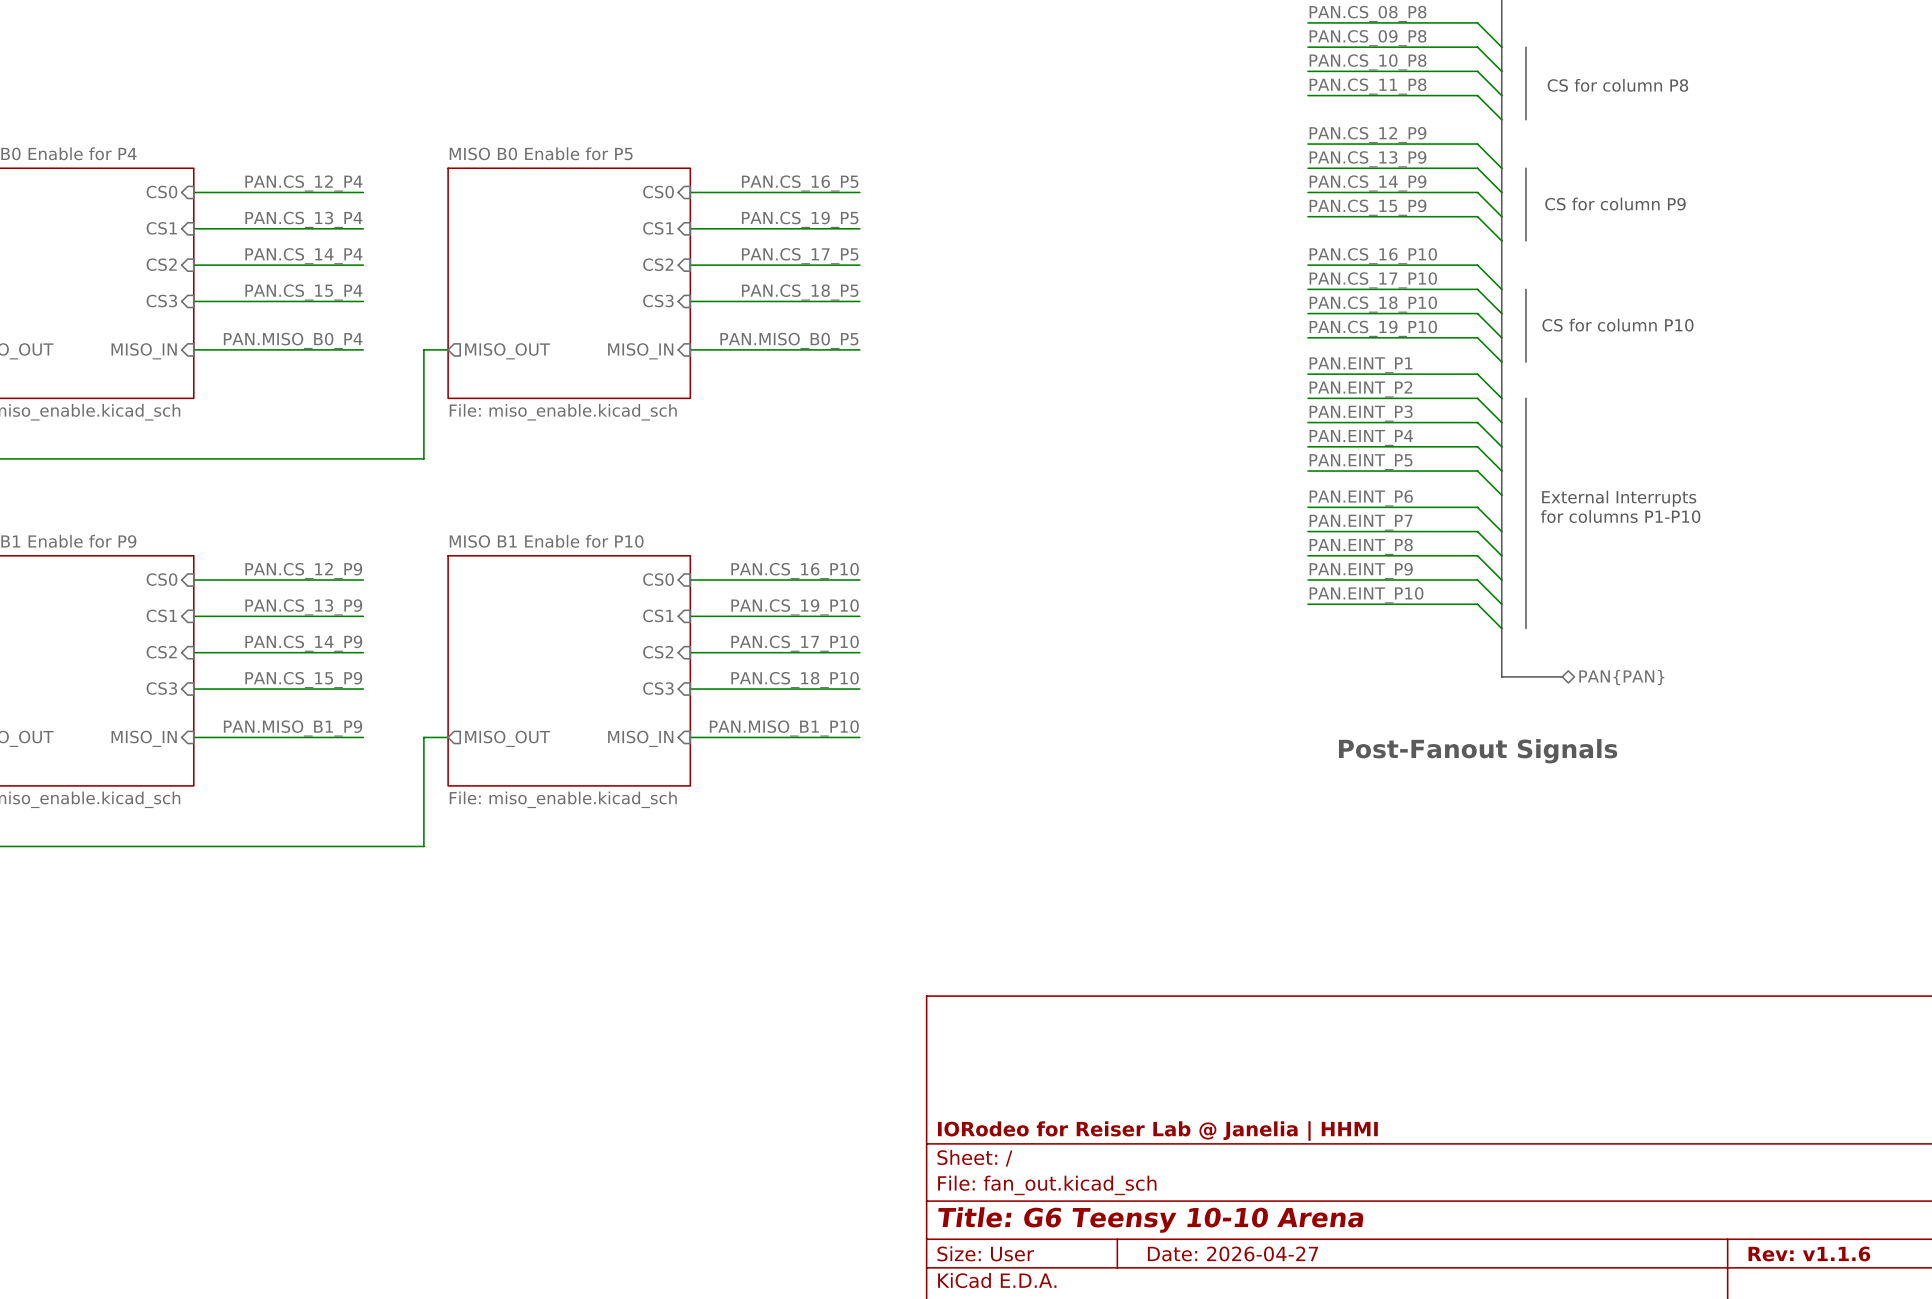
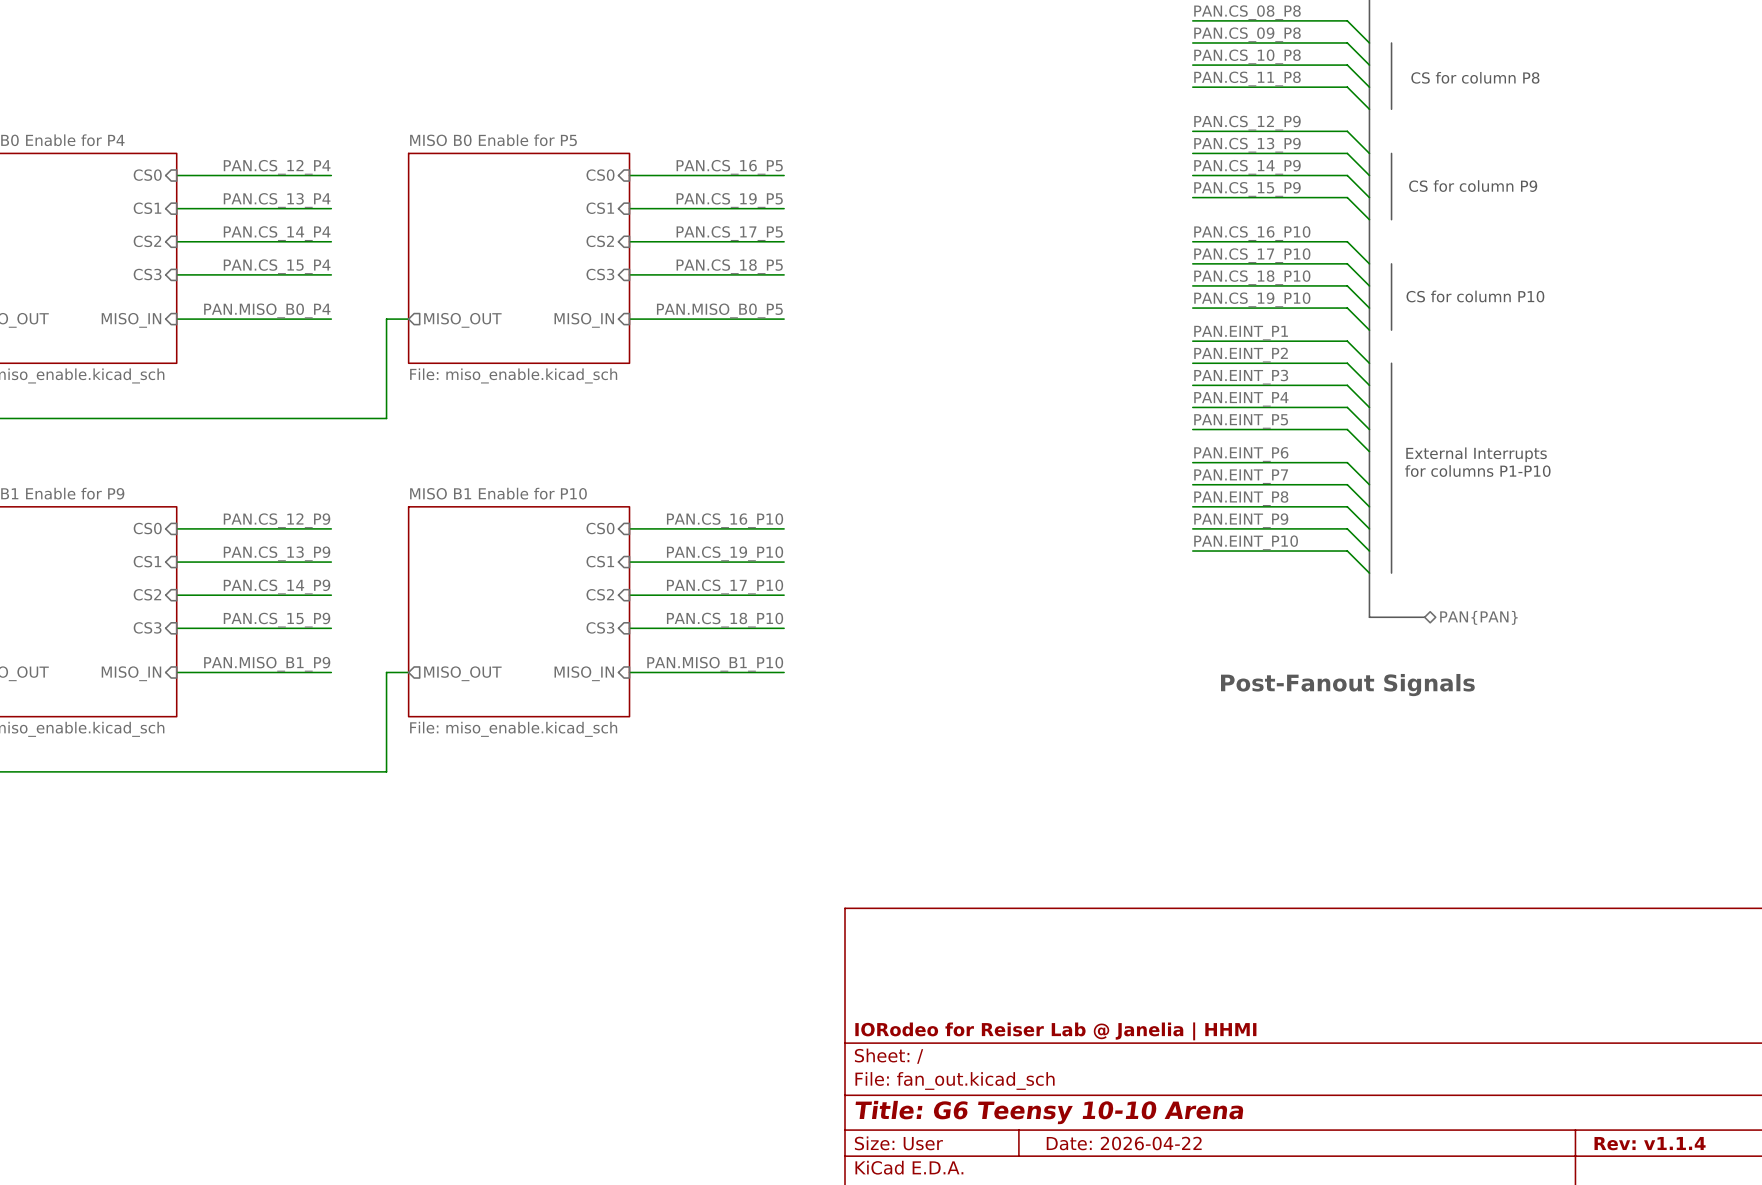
title block: Date: 2026-04-27 (1232, 1253) -> Date: 2026-04-22 (1124, 1143)
title block: Rev: v1.1.6 (1809, 1253) -> Rev: v1.1.4 (1650, 1143)

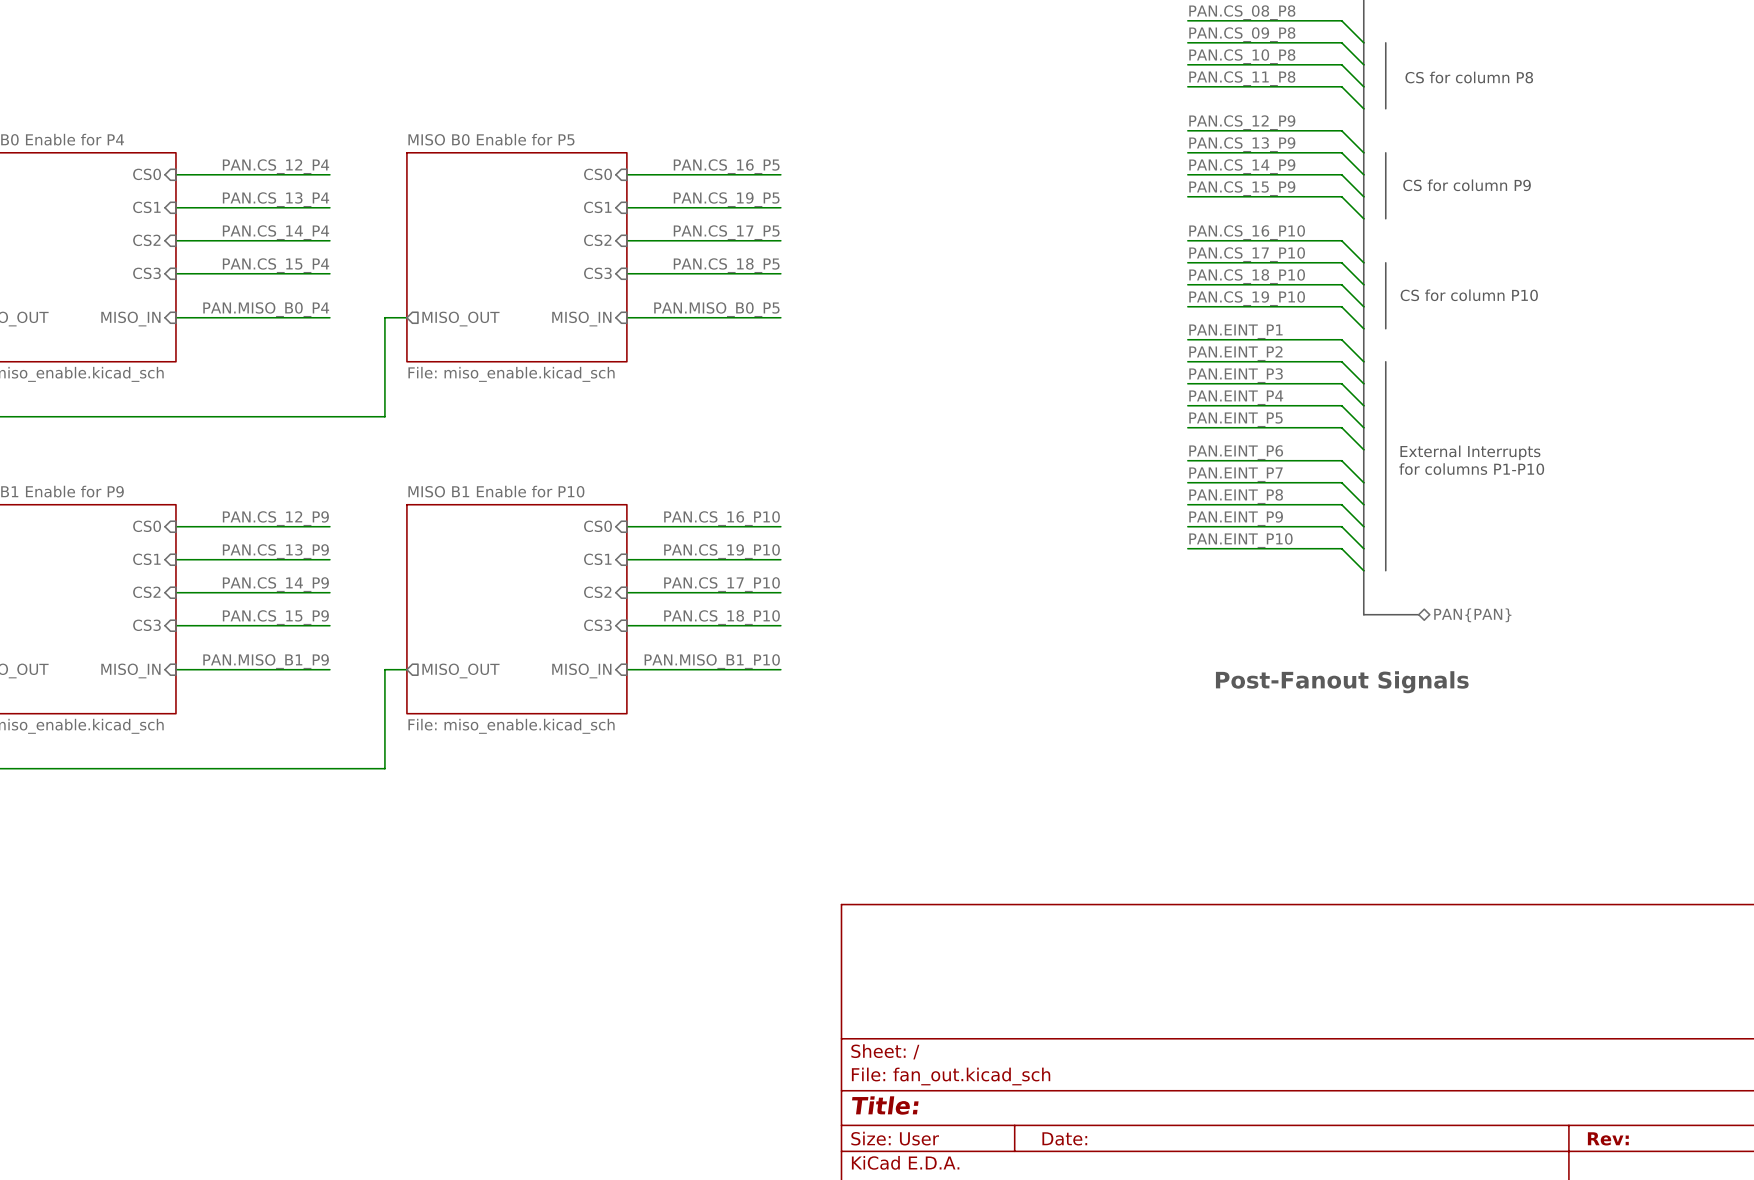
title block: IORodeo for Reiser Lab @ Janelia | HHMI (1055, 1031) -> none
title block: Title: G6 Teensy 10-10 Arena (1049, 1112) -> Title: (885, 1105)
title block: Date: 2026-04-22 (1124, 1143) -> Date: (1064, 1138)
title block: Rev: v1.1.4 (1650, 1143) -> Rev: (1608, 1138)

